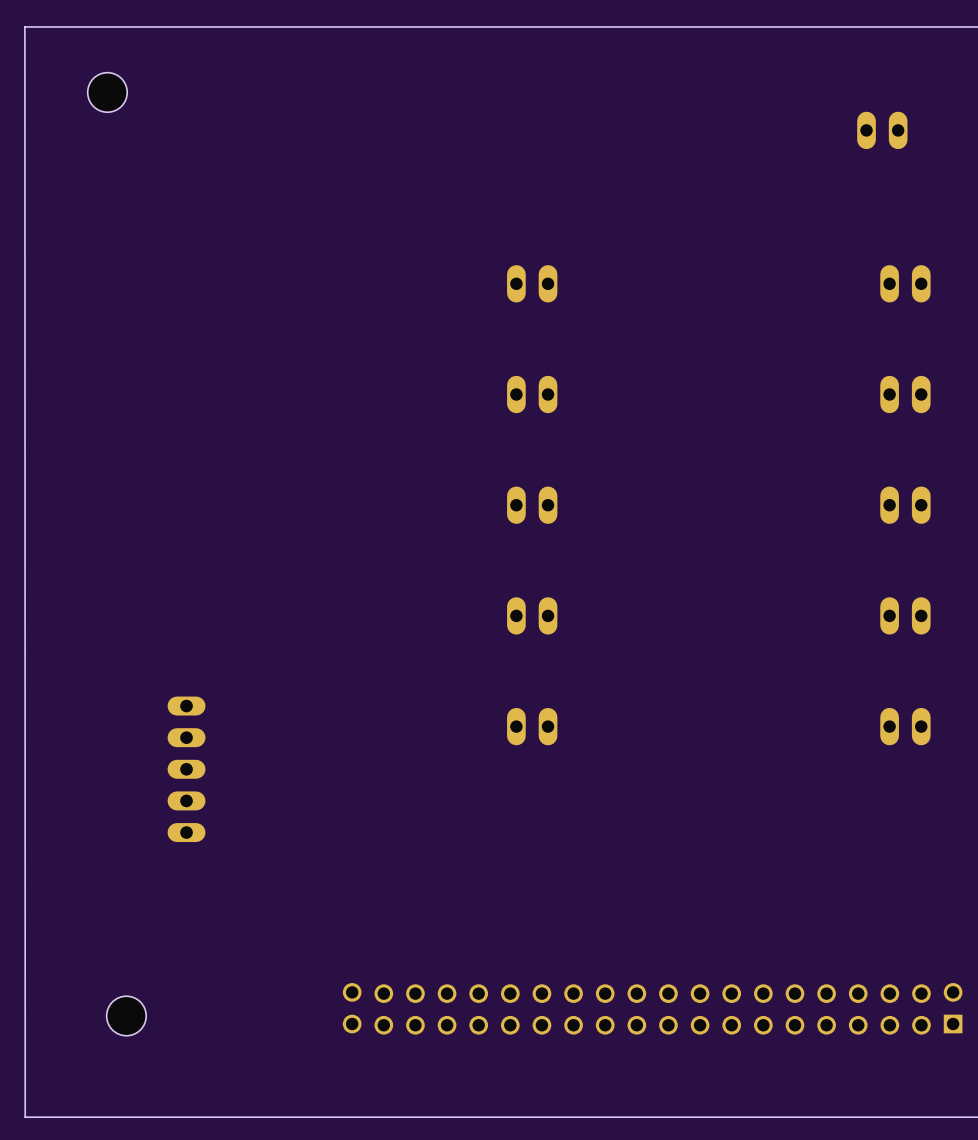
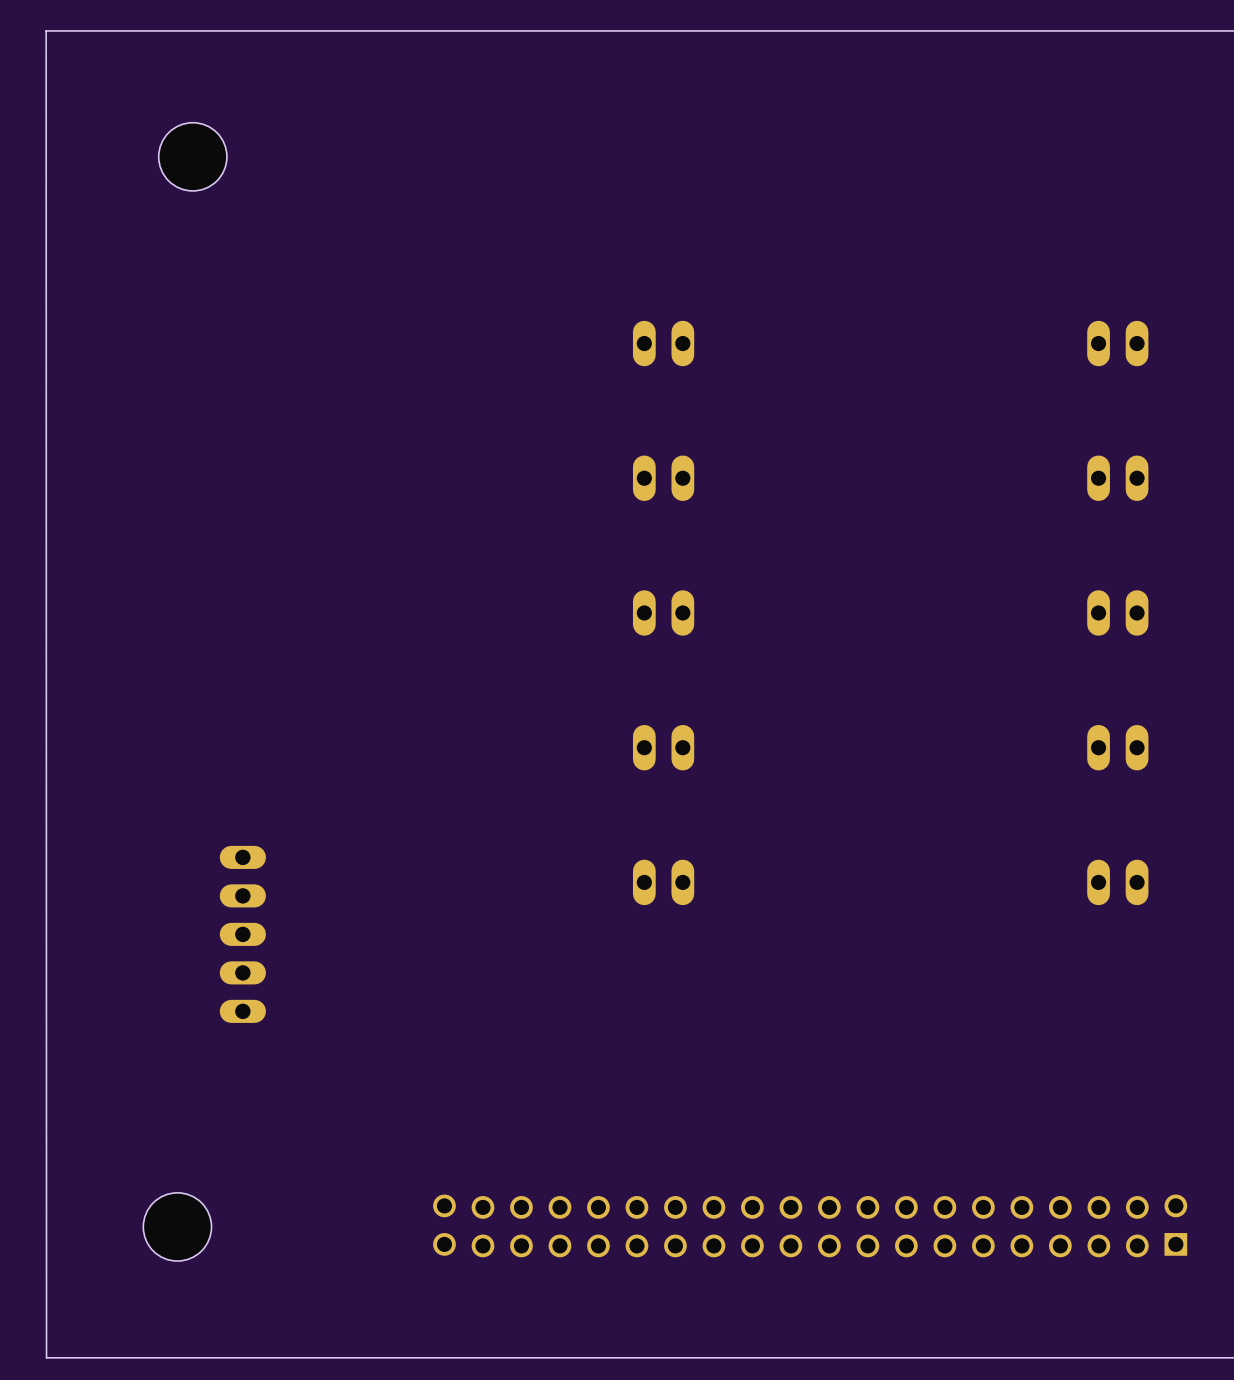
part: (107, 92) -> none
part: none -> (192, 156)
part: (882, 130) -> none
part footprint: [106, 996, 147, 1036] -> [143, 1192, 212, 1262]

